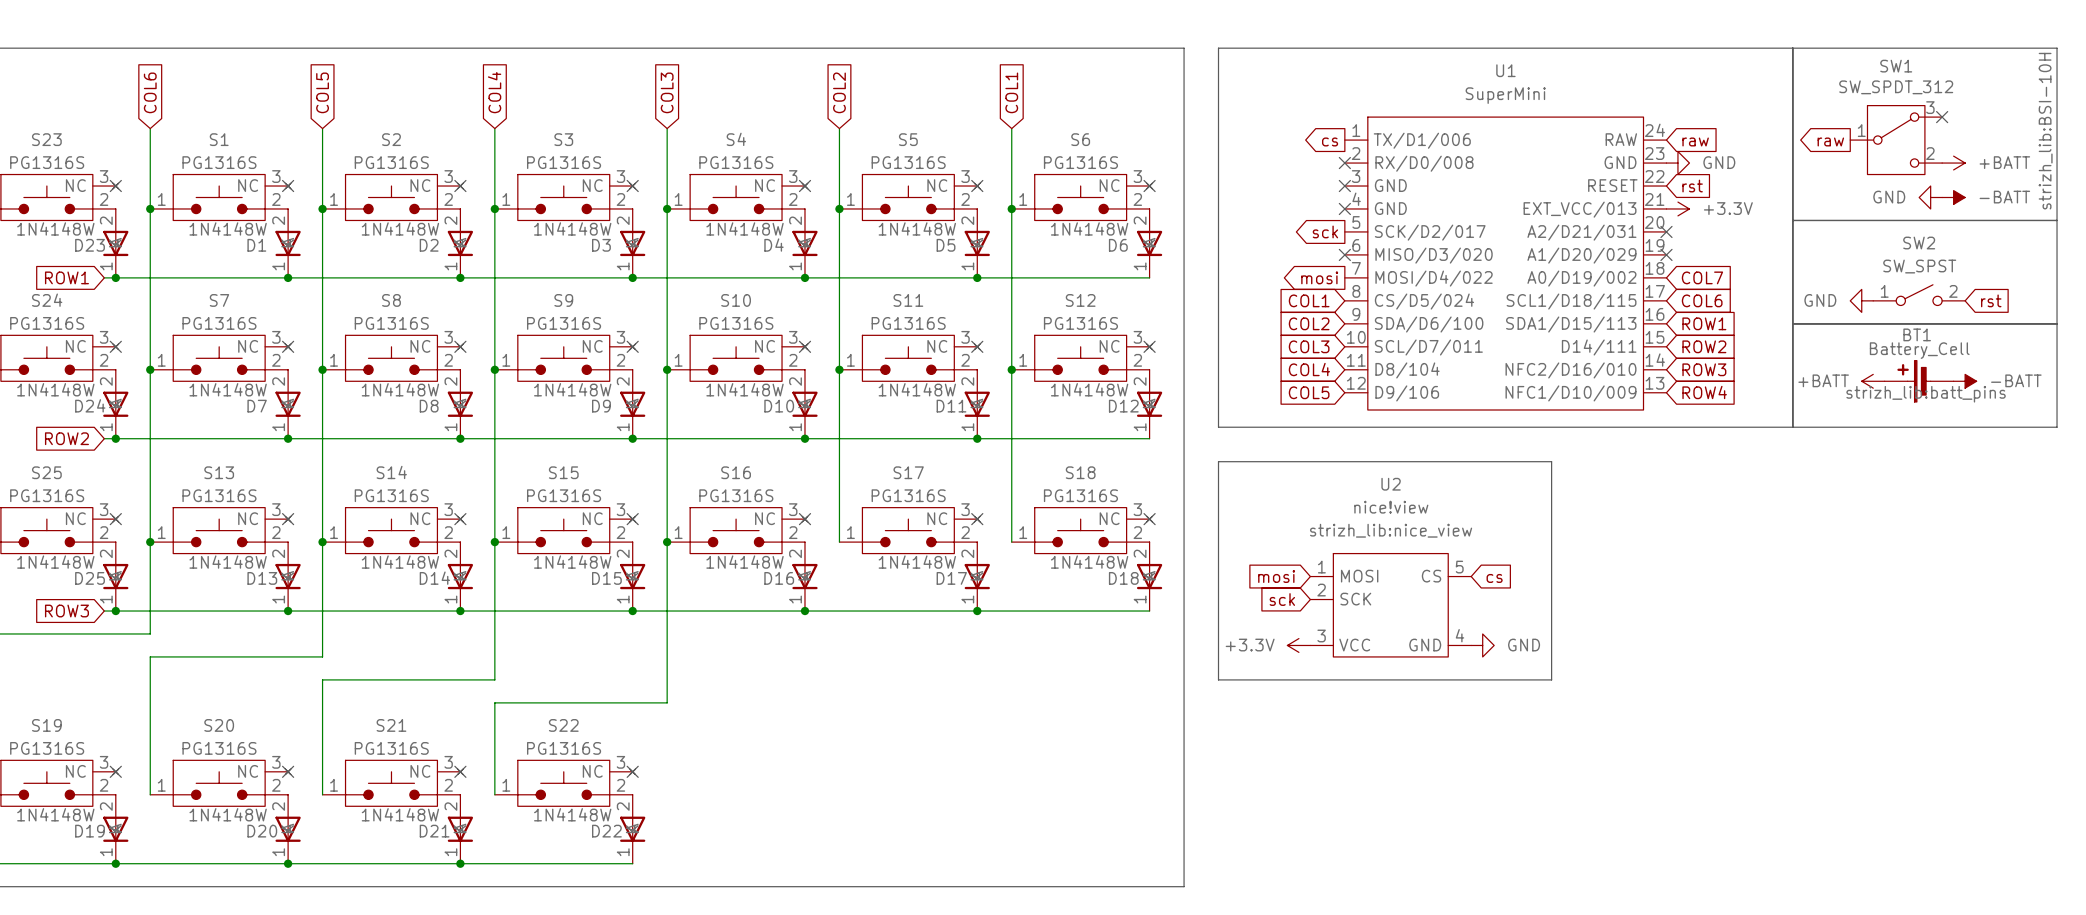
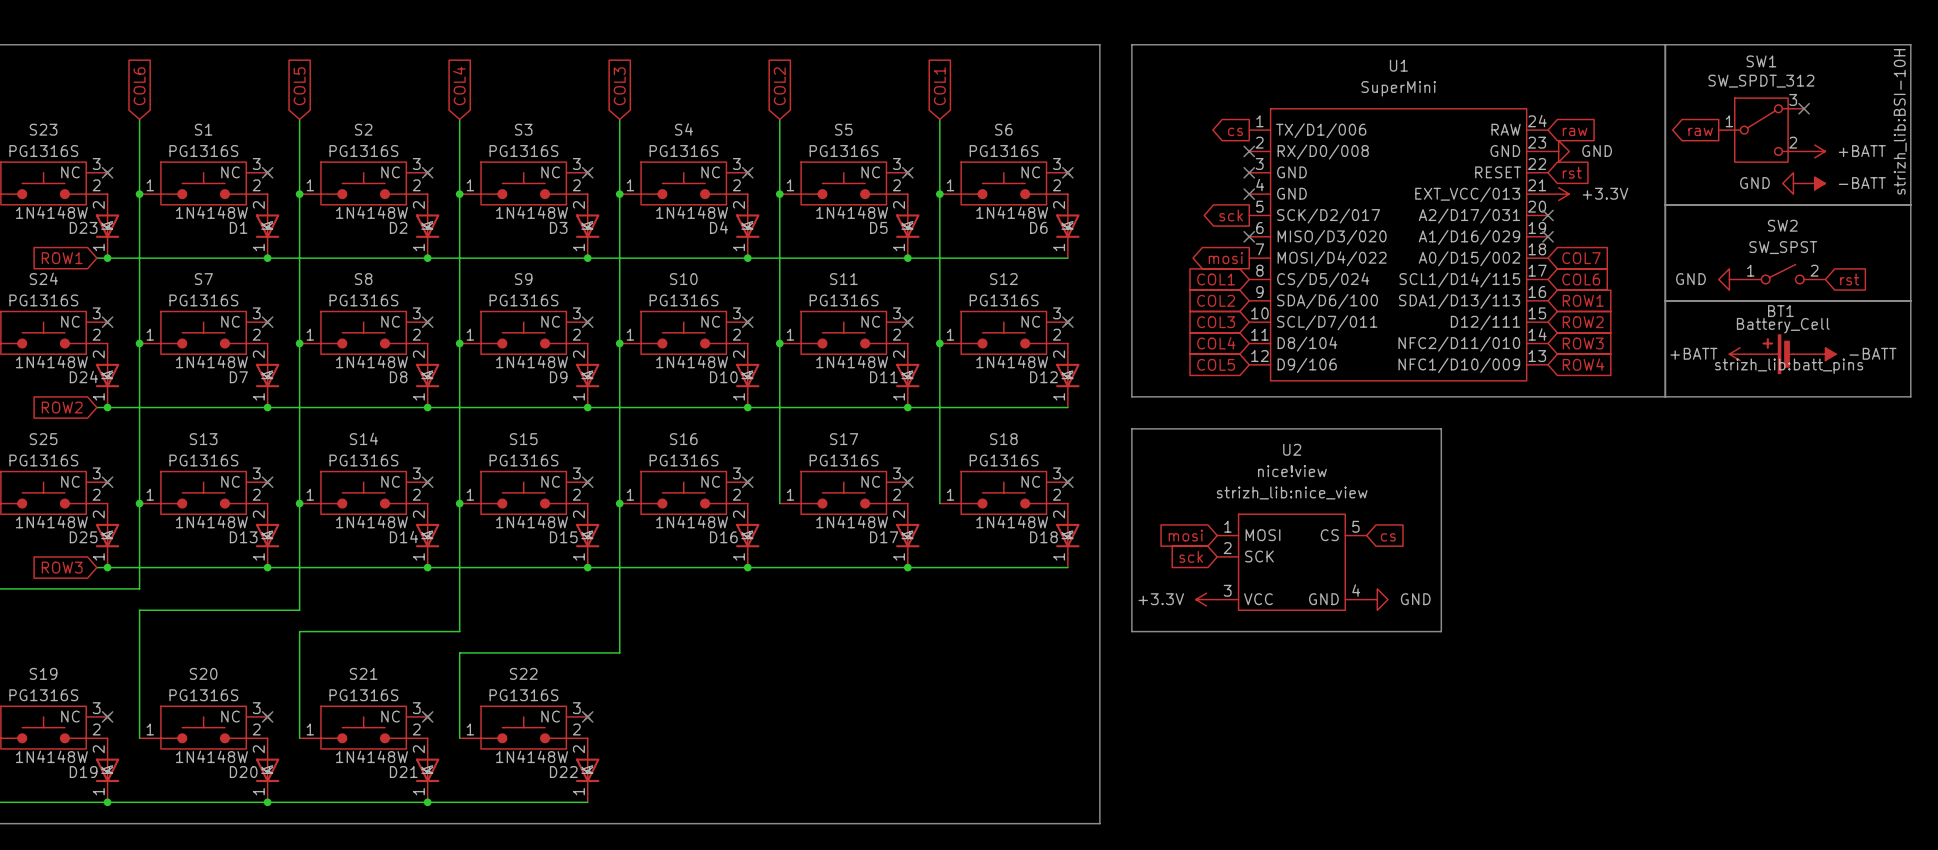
U1 pin name: A2/D21/031 (1581, 232) -> A2/D17/031 (1469, 216)
U1 pin name: A1/D20/029 (1581, 255) -> A1/D16/029 (1469, 237)
U1 pin name: A0/D19/002 (1581, 278) -> A0/D15/002 (1469, 258)
U1 pin name: SCL1/D18/115 (1571, 301) -> SCL1/D14/115 (1459, 280)
U1 pin name: SDA1/D15/113 (1571, 324) -> SDA1/D13/113 (1459, 301)
U1 pin name: D14/111 (1599, 347) -> D12/111 (1485, 322)
U1 pin name: NFC2/D16/010 (1570, 370) -> NFC2/D11/010 (1459, 344)

